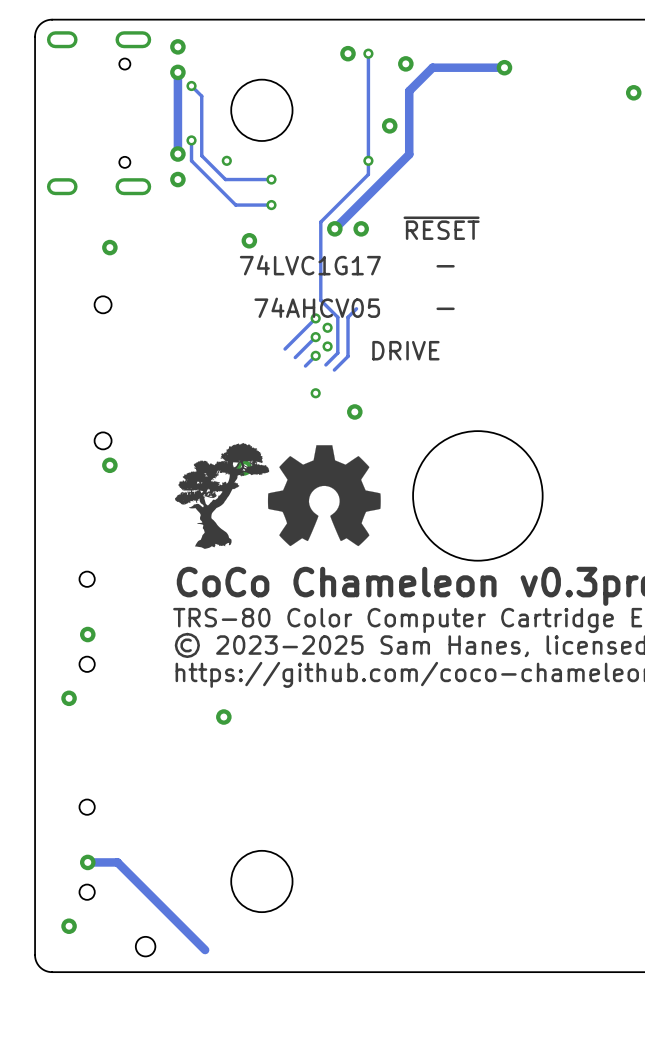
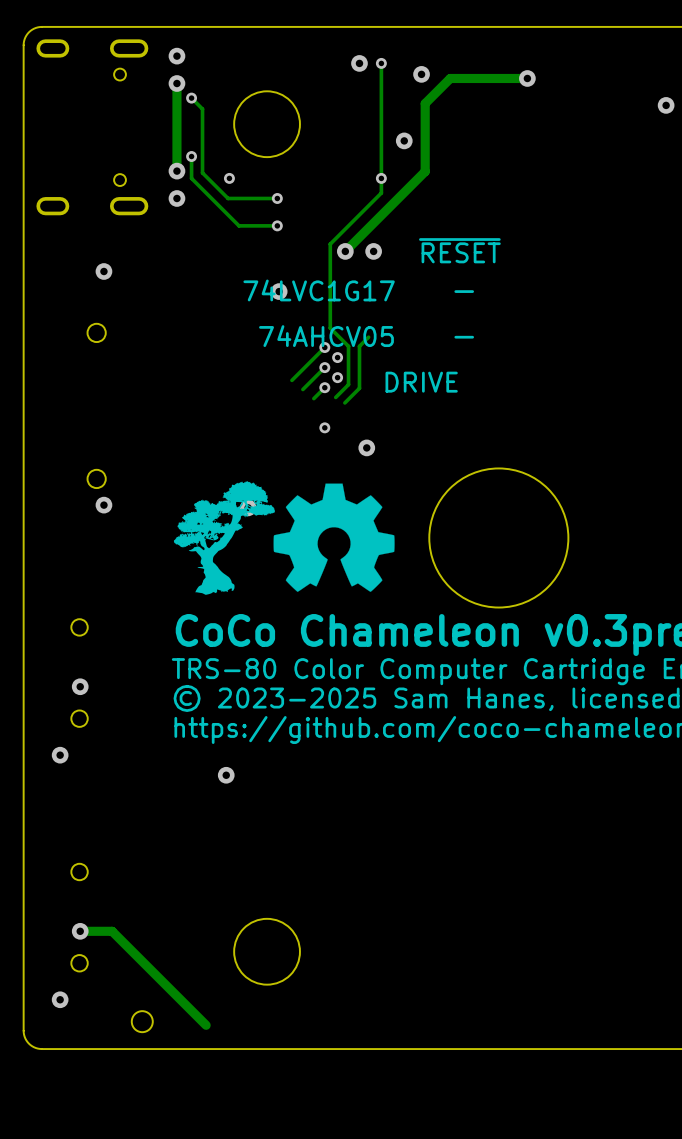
via position: (249, 240) -> (279, 291)

